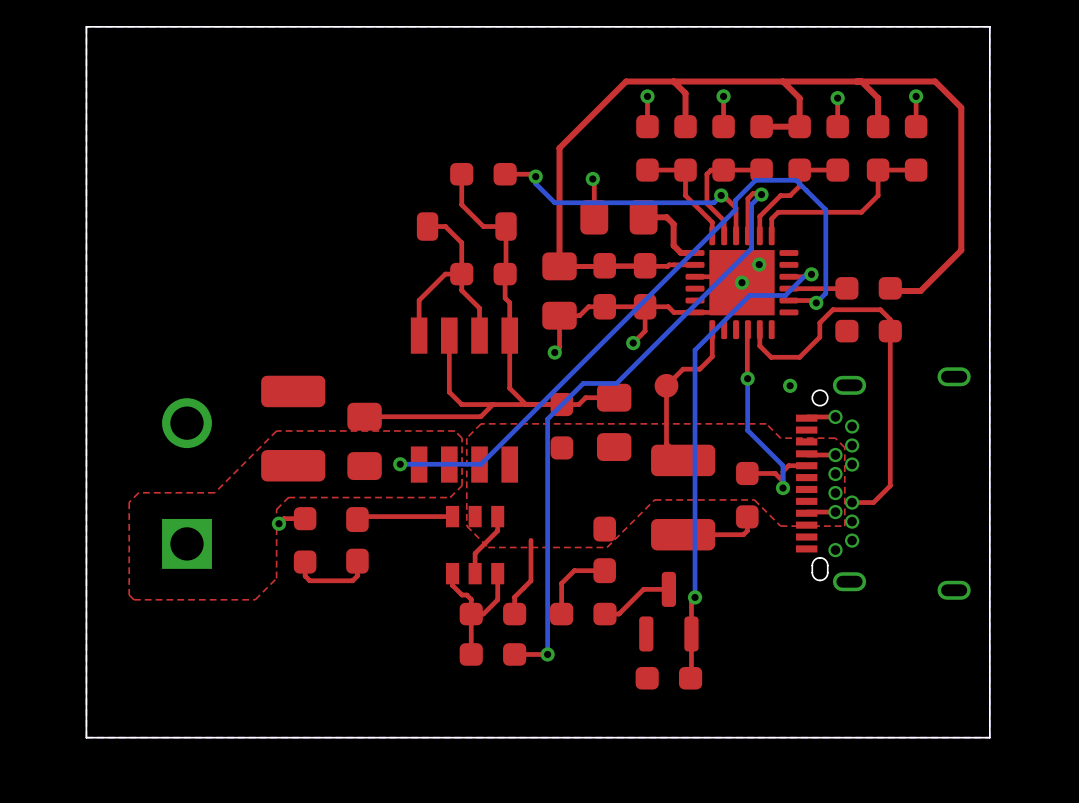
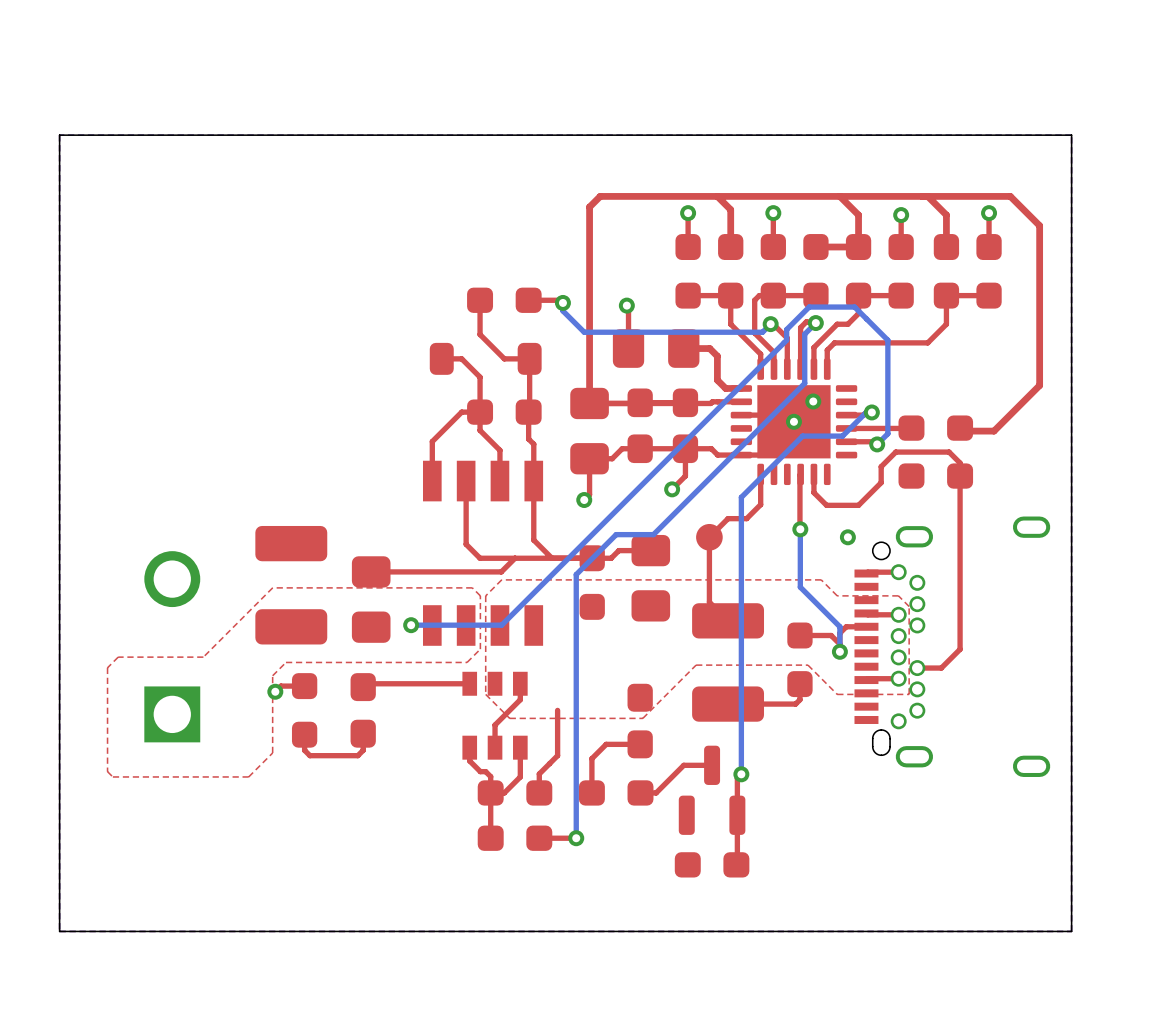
top track: (626, 81) (559, 148) -> (664, 196) (600, 196) (589, 207) (589, 270)

